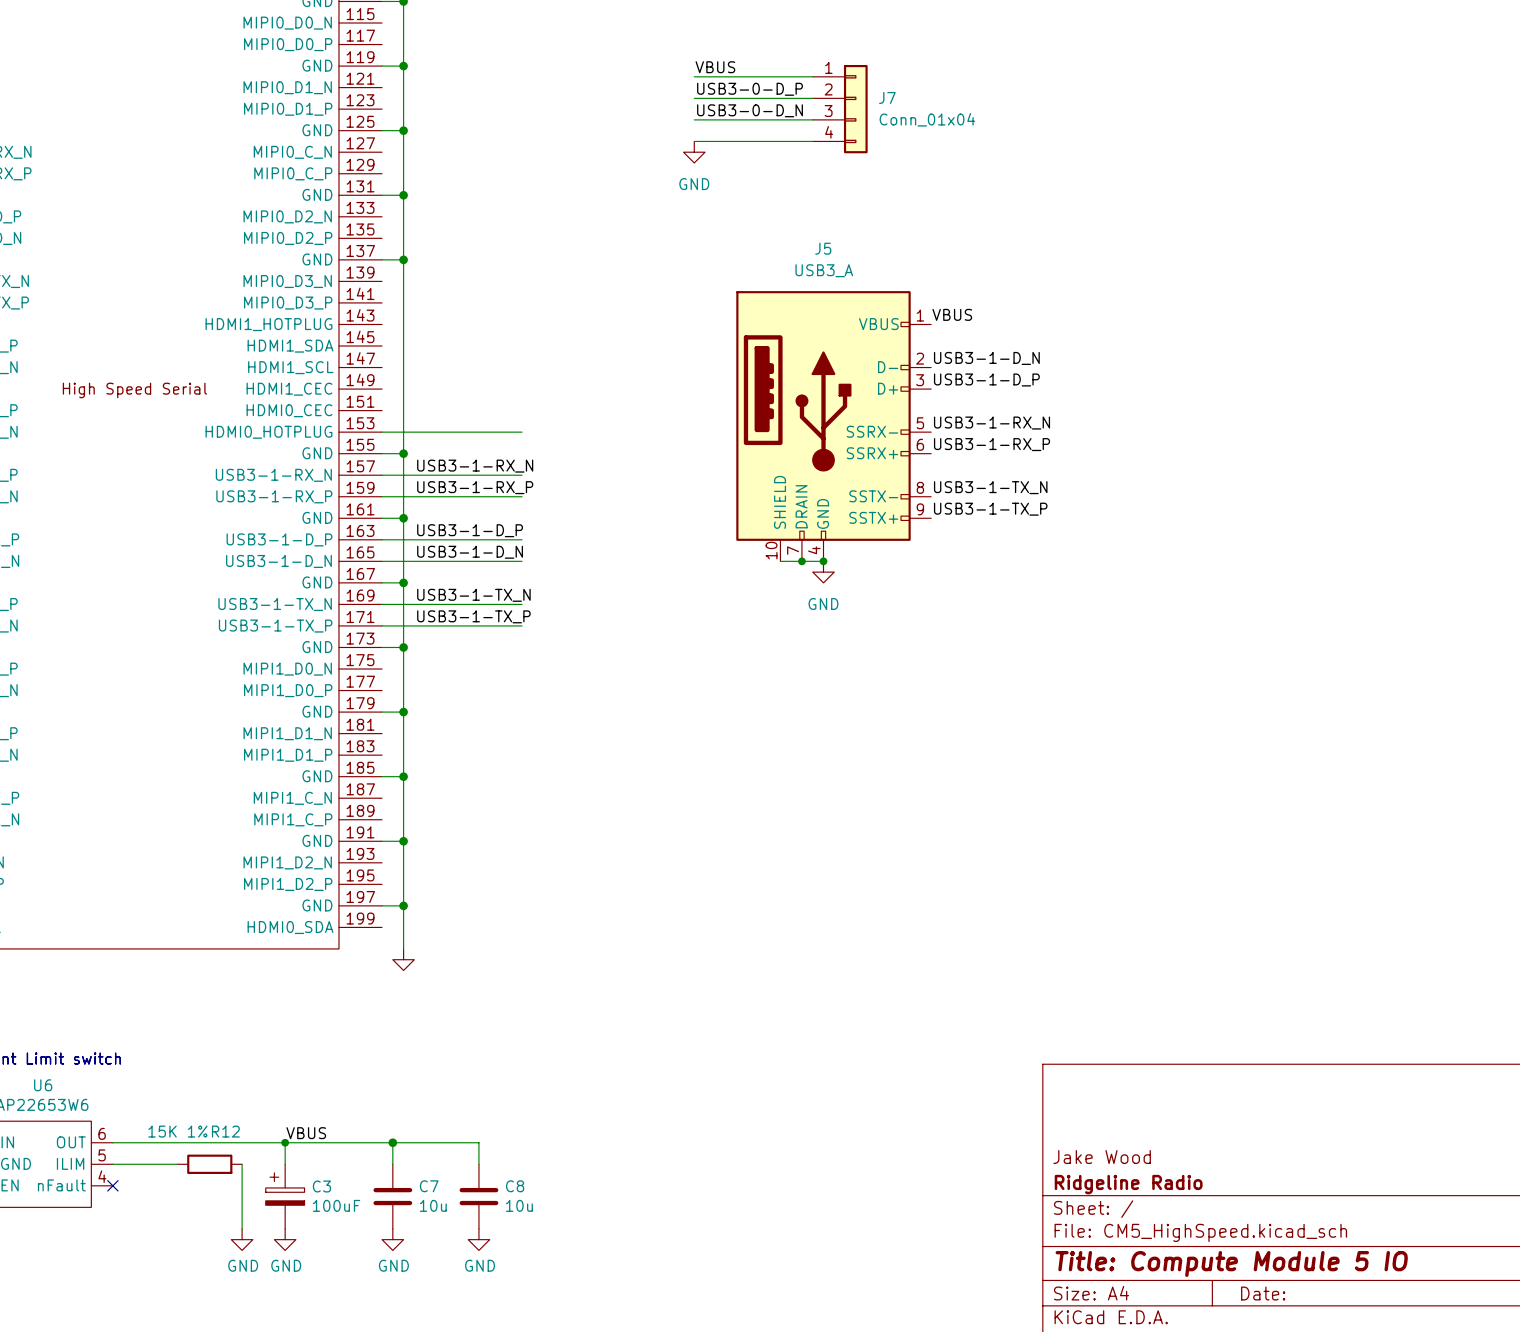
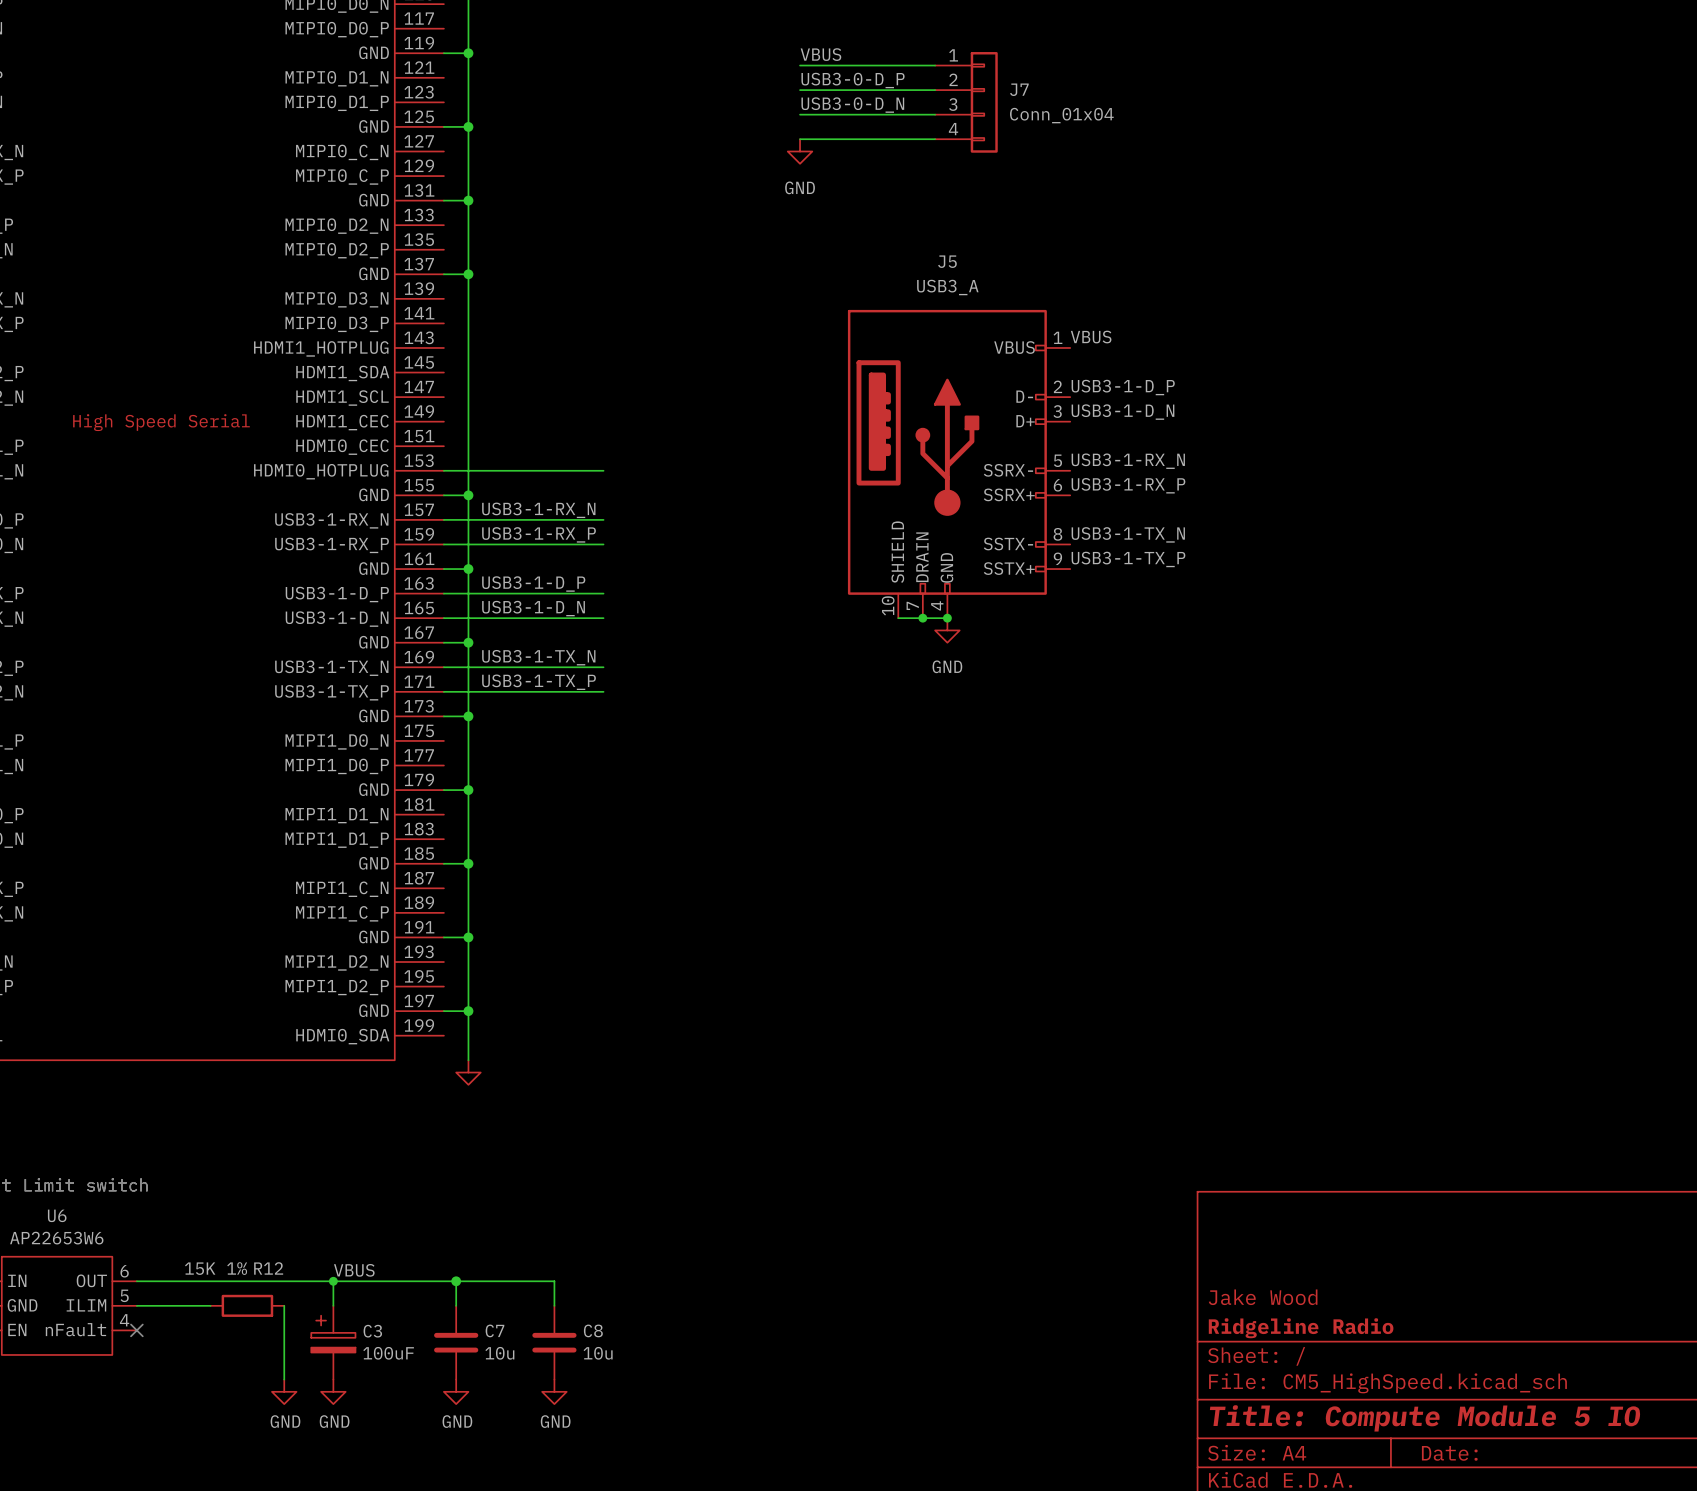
label: USB3-1-D_N (986, 358) -> USB3-1-D_P (1123, 387)
label: USB3-1-D_P (986, 379) -> USB3-1-D_N (1122, 412)

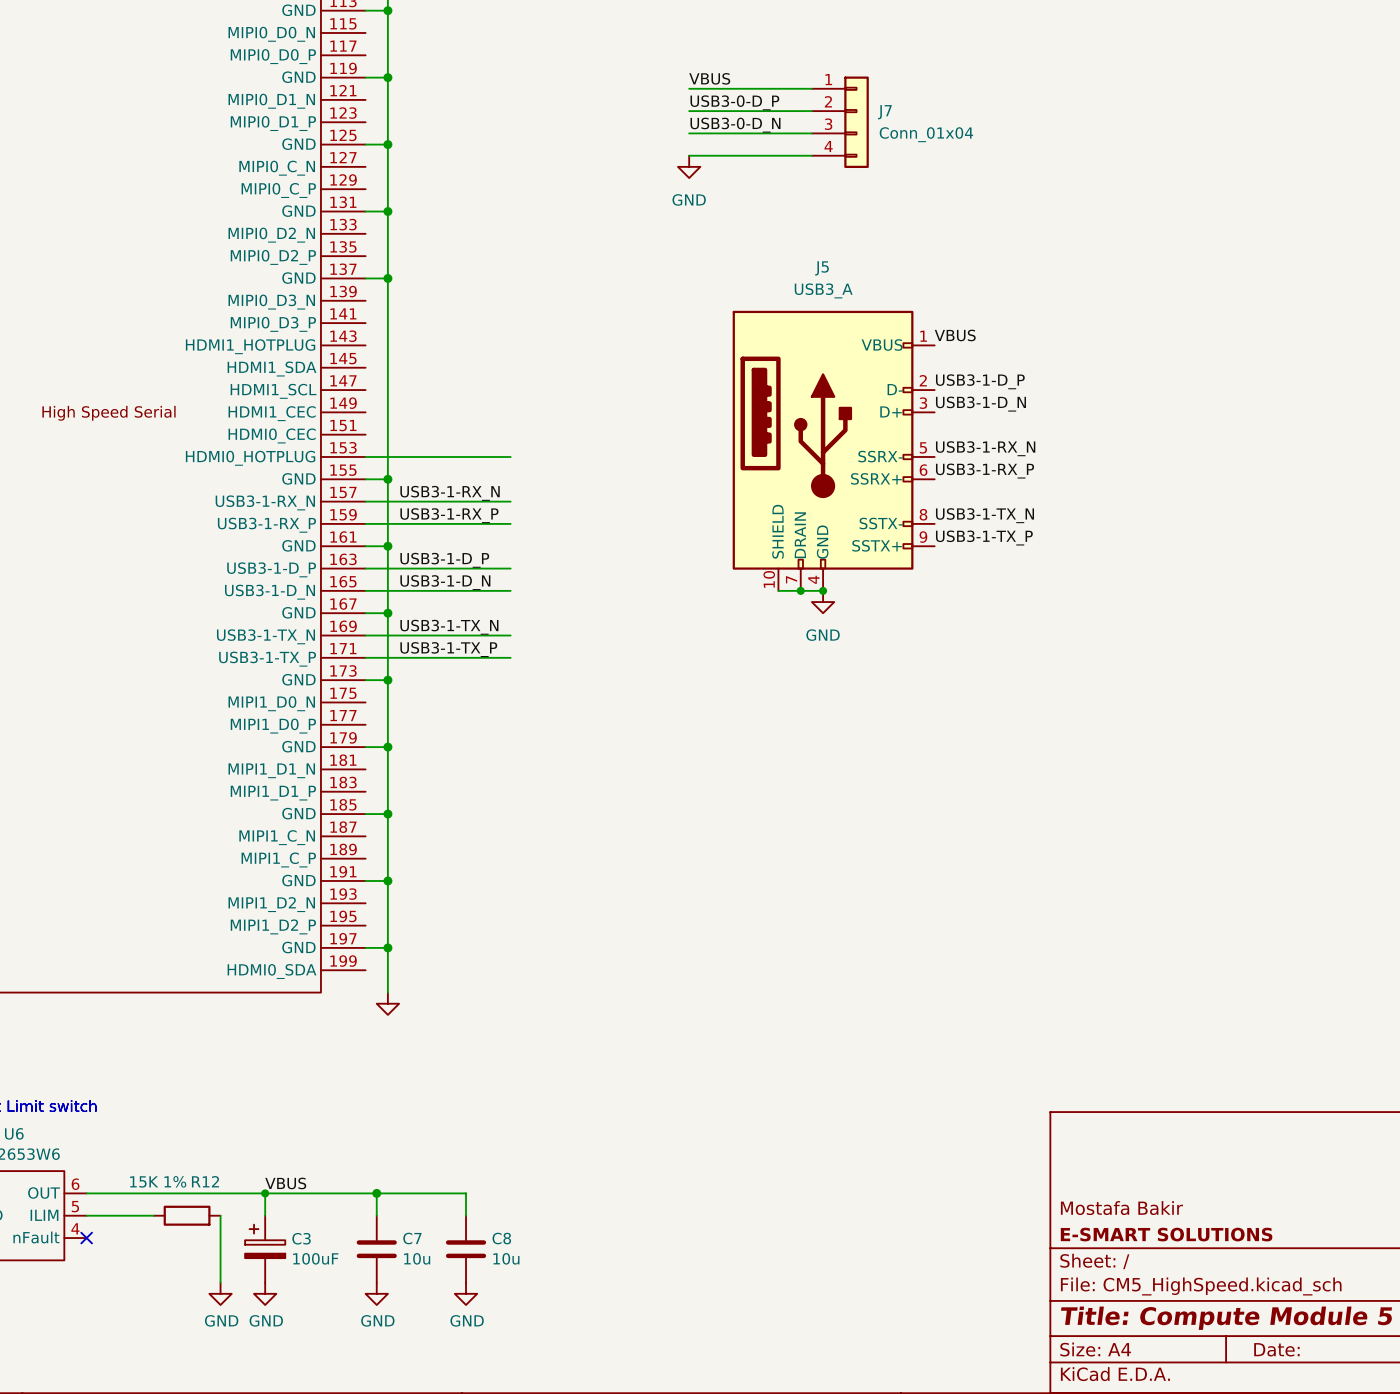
title block: Jake Wood (1263, 1297) -> Mostafa Bakir (1121, 1208)
title block: Ridgeline Radio (1301, 1328) -> E-SMART SOLUTIONS (1166, 1234)

